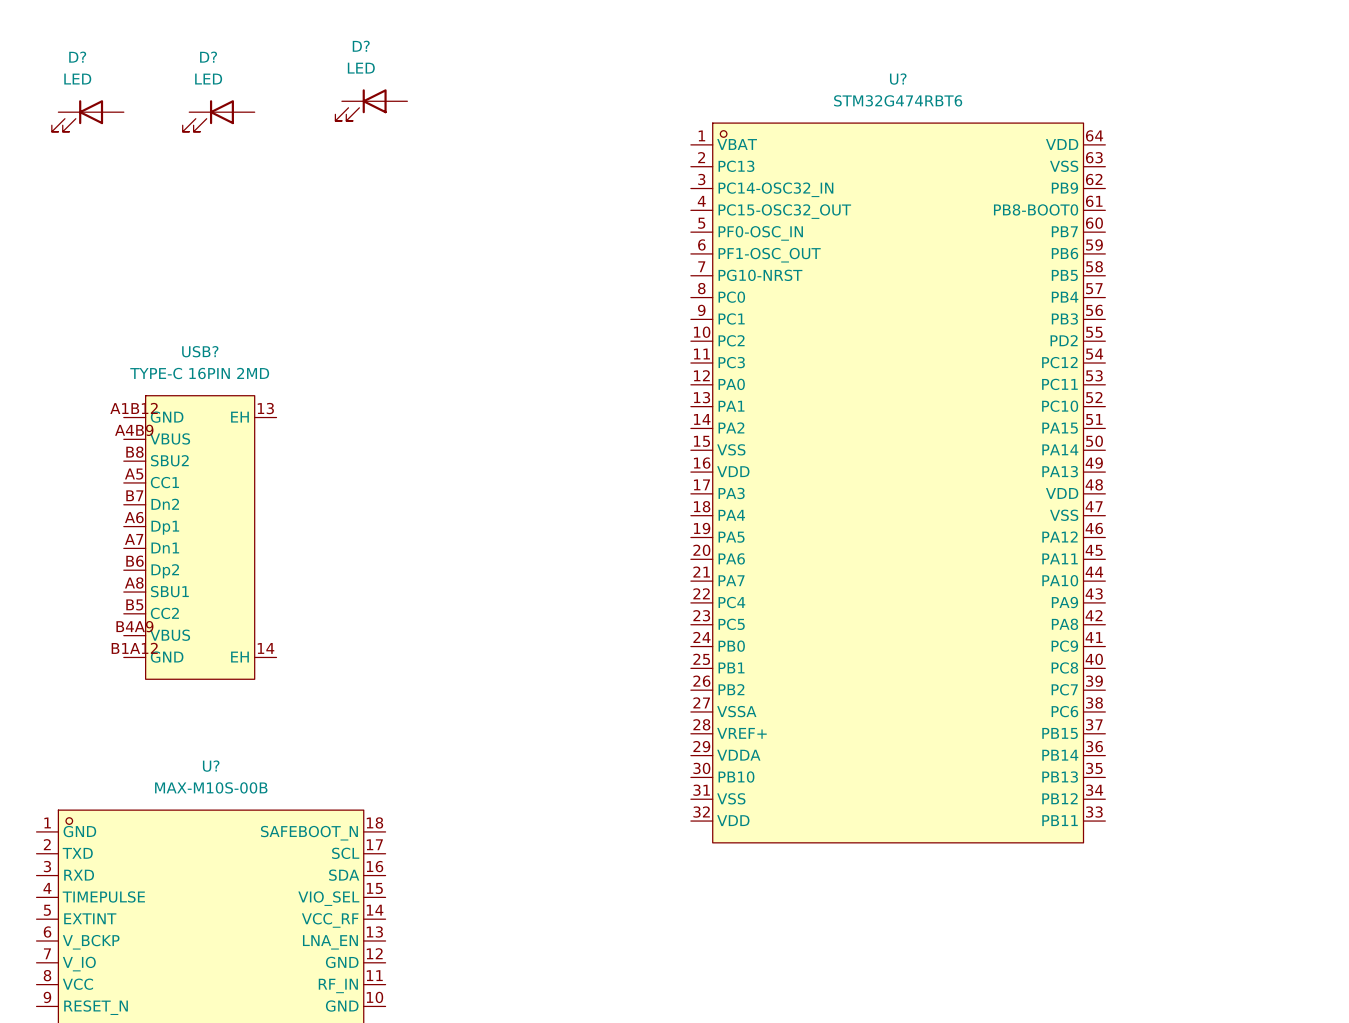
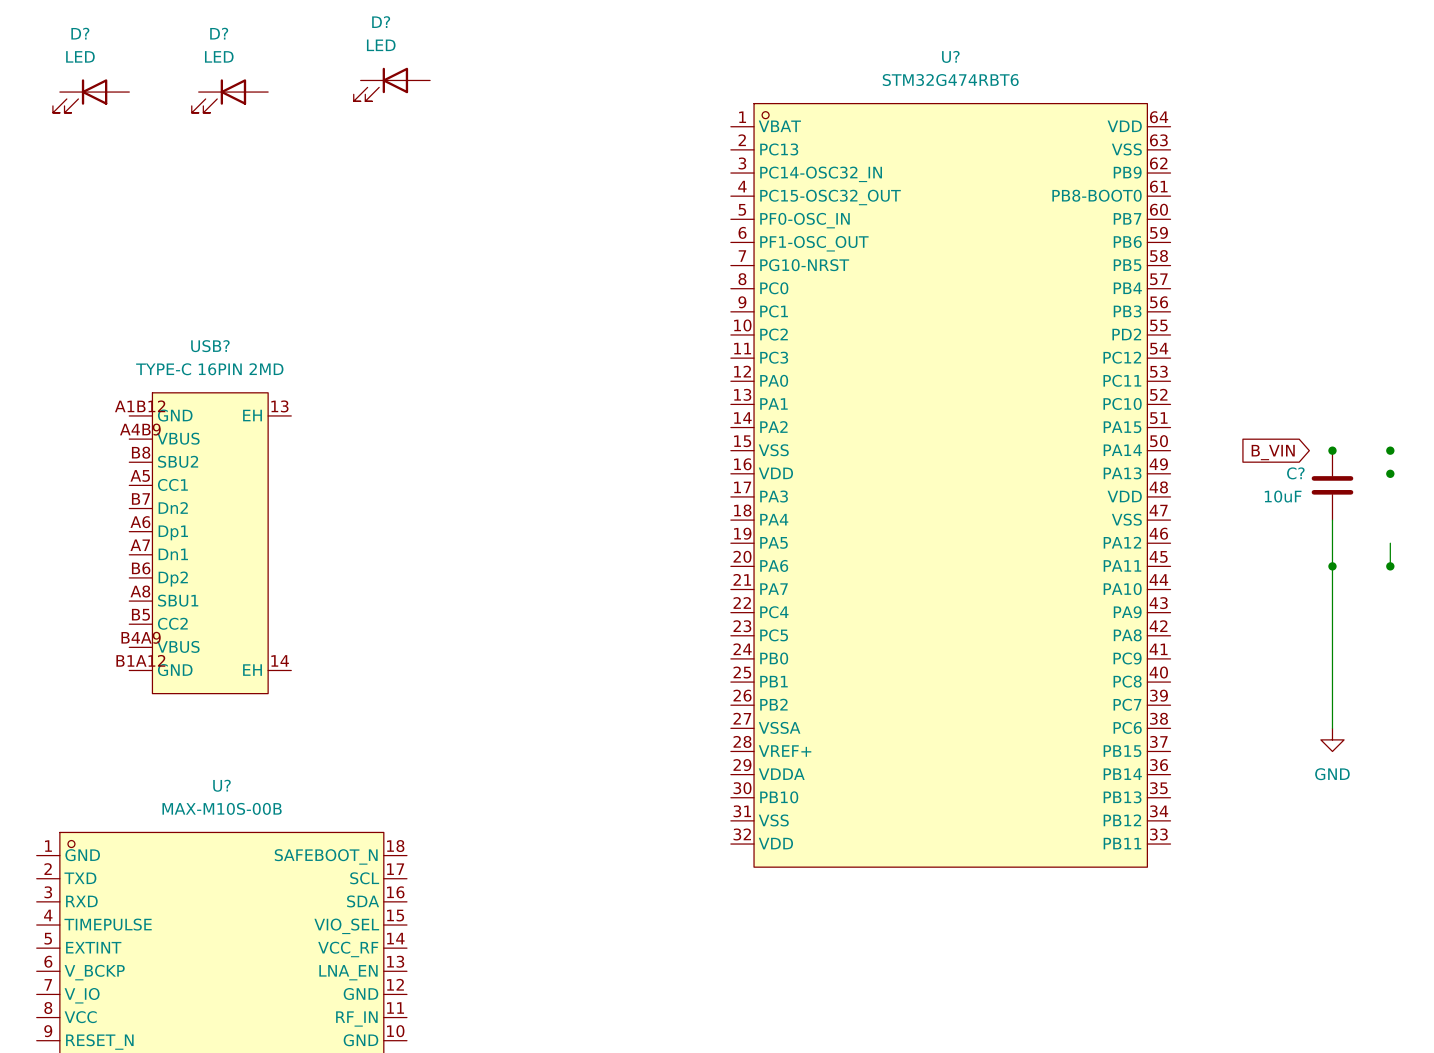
junction: none -> (1332, 450)
junction: none -> (1390, 450)
global label: none -> B_VIN (1273, 452)
junction: none -> (1390, 473)
C?: none -> 10uF (1332, 485)
wire: none -> (1332, 520) (1332, 728)
wire: none -> (1390, 543) (1390, 566)
junction: none -> (1332, 566)
junction: none -> (1390, 566)
power symbol: none -> GND (1332, 739)

